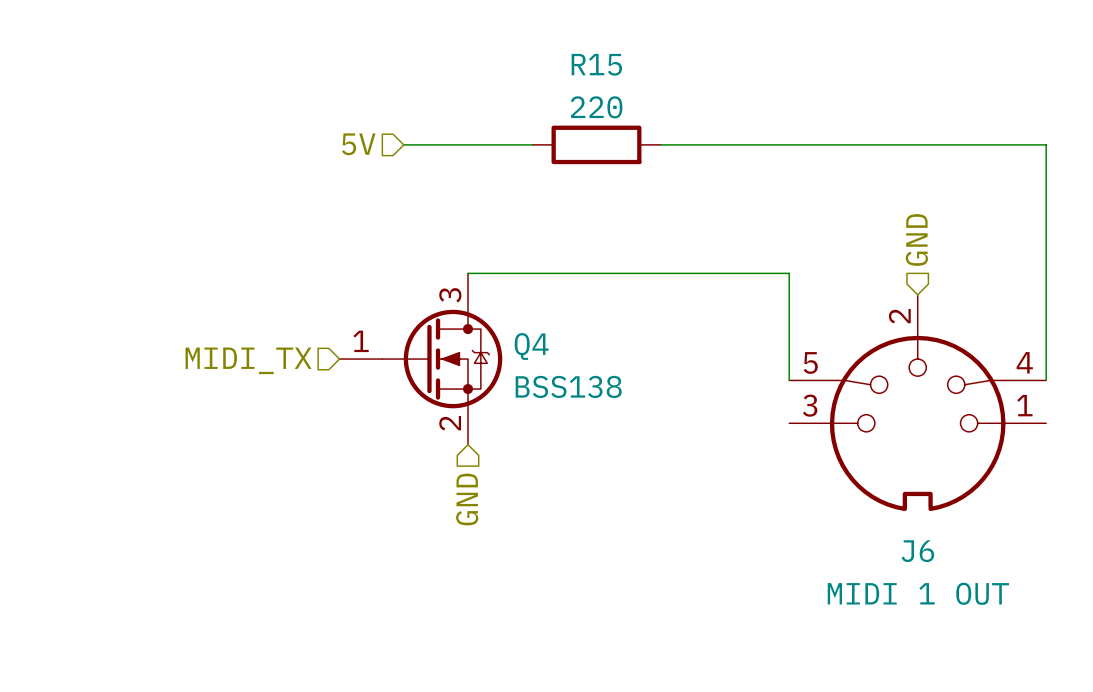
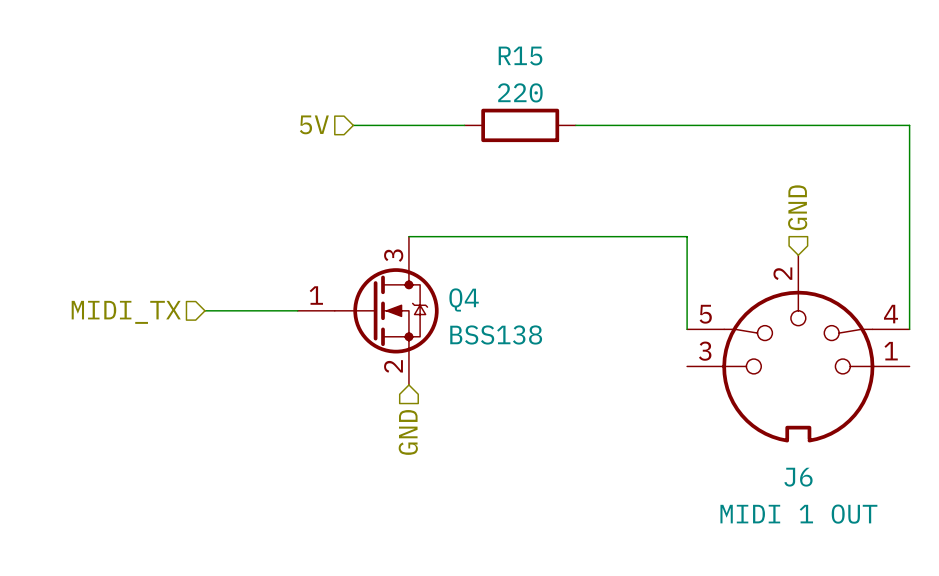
wire: none -> (205, 310) (297, 310)
hierarchical label position: MIDI_TX (248, 360) -> MIDI_TX (126, 312)

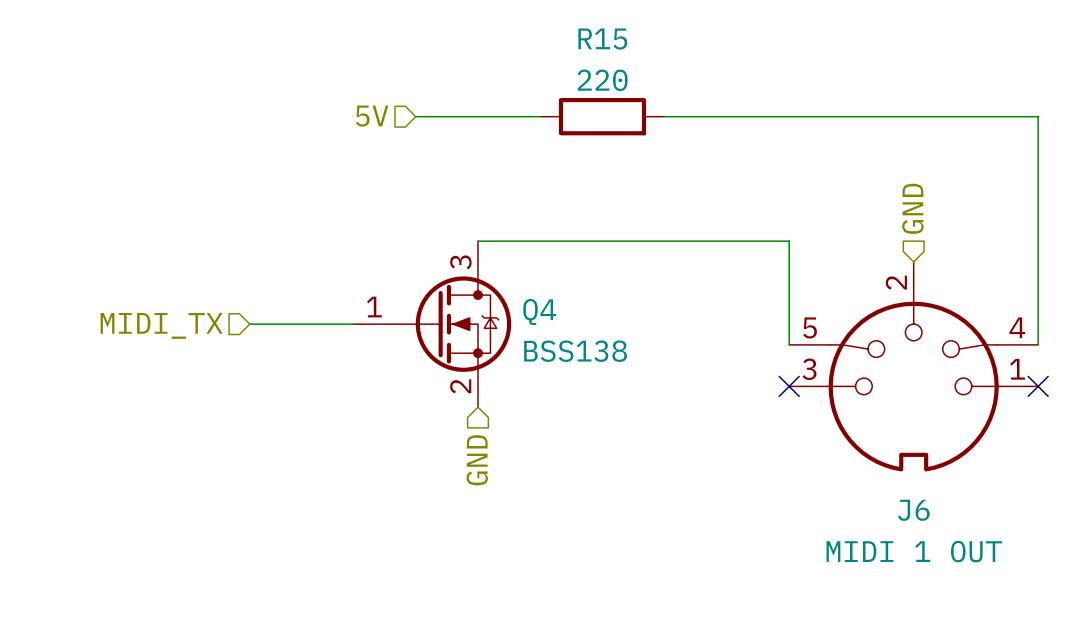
no-connect mark: none -> (789, 386)
no-connect mark: none -> (1038, 386)

